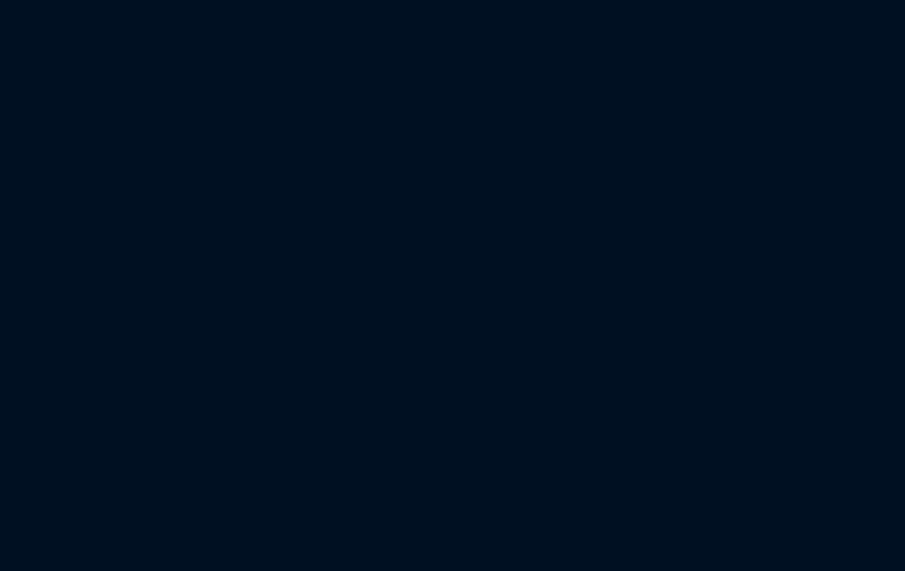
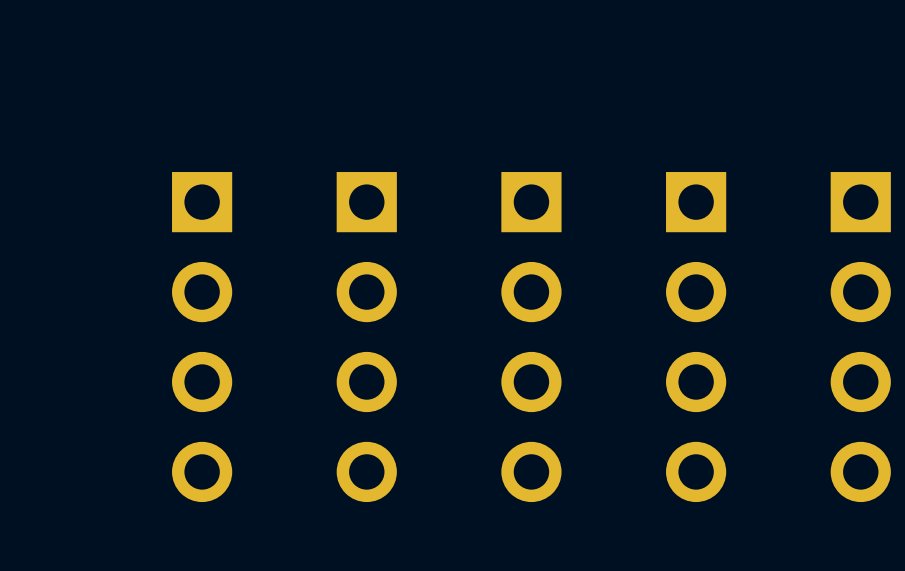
part: none -> (202, 337)
part: none -> (366, 337)
part: none -> (531, 337)
part: none -> (696, 337)
part: none -> (860, 337)

